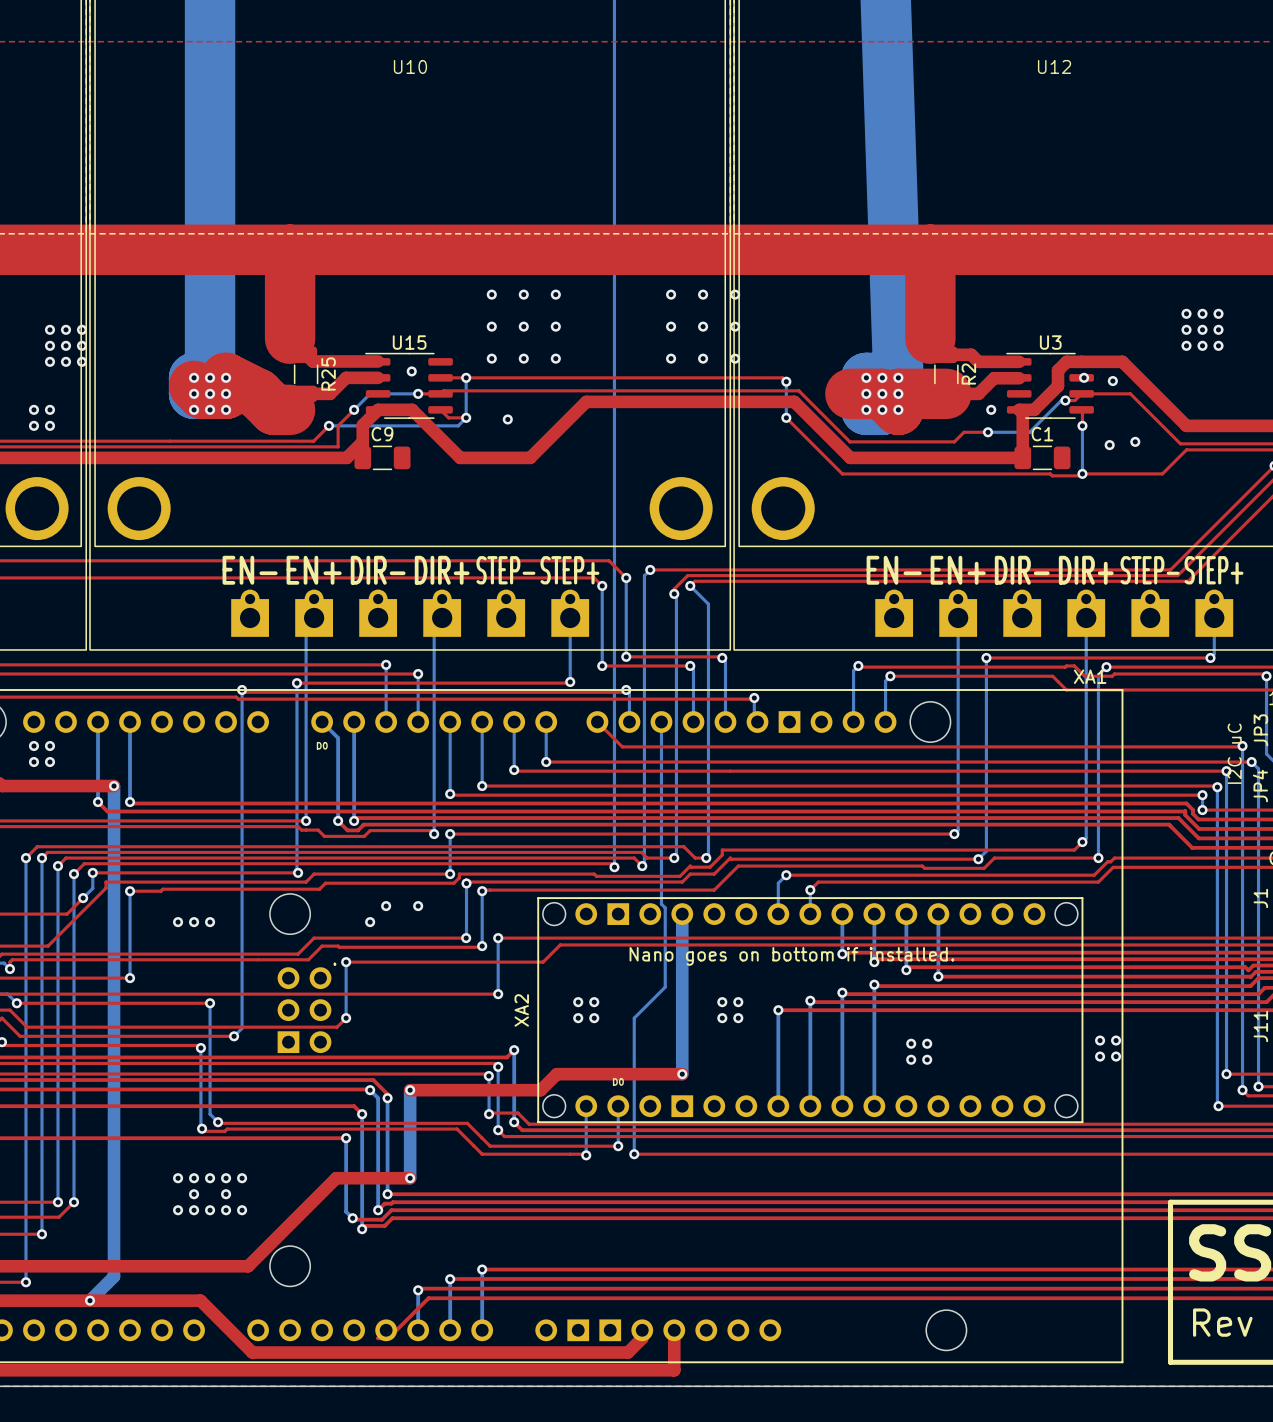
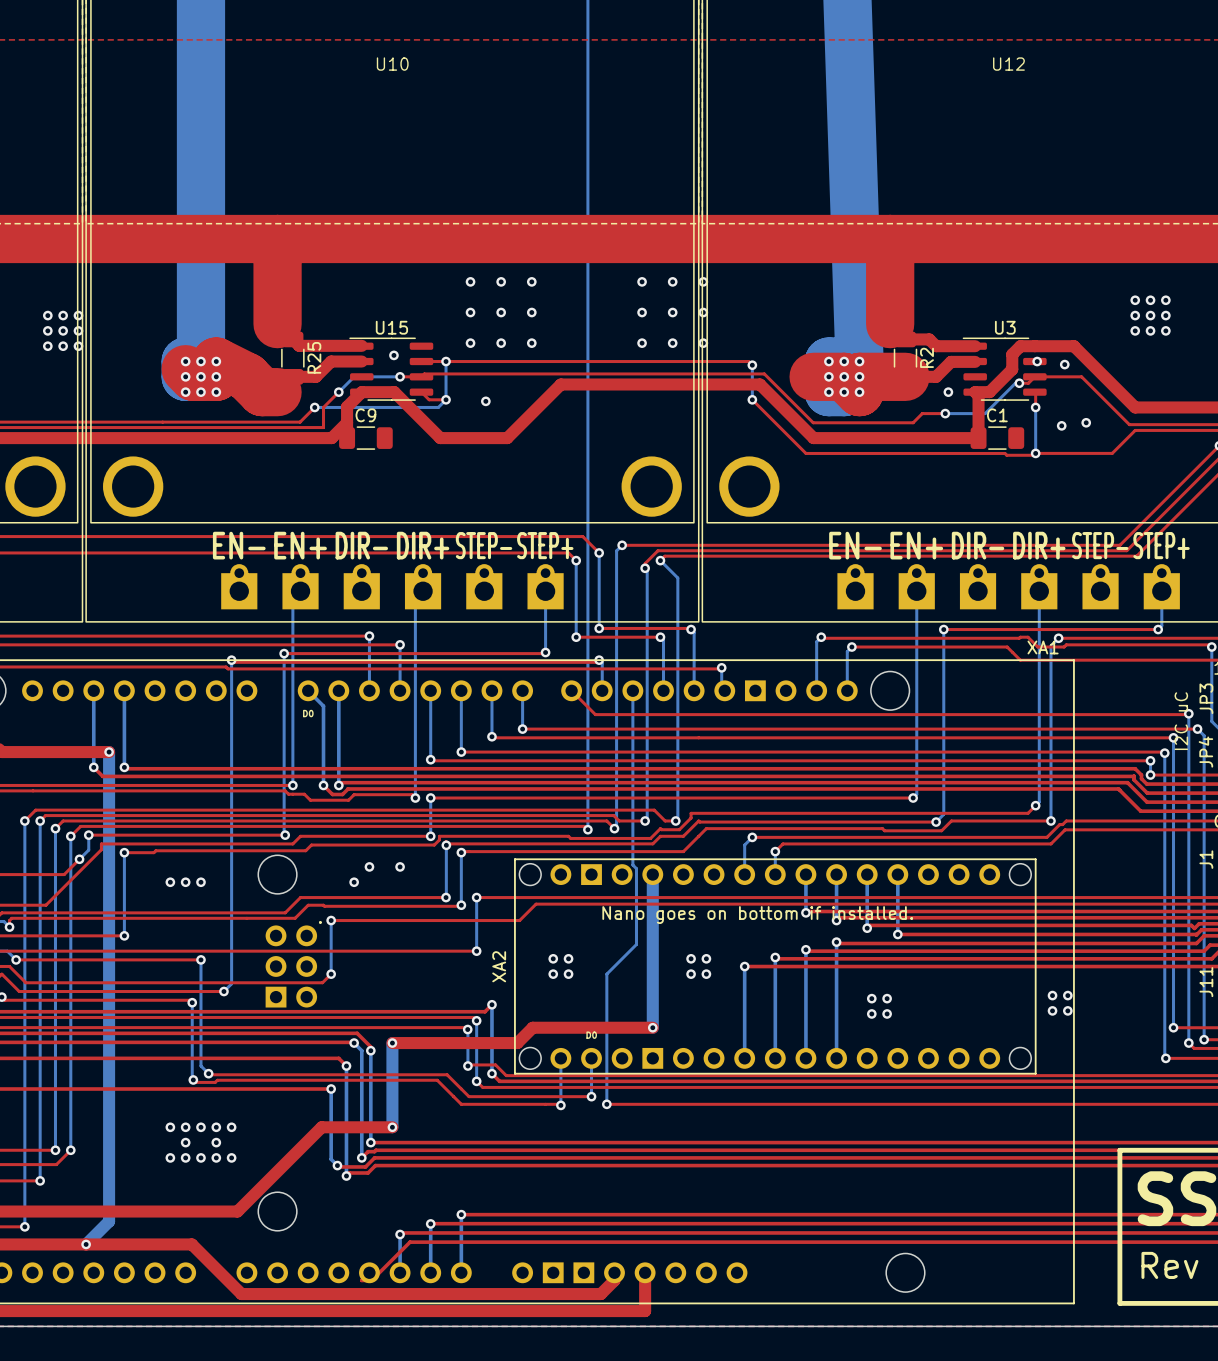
via: (33, 409) -> none
via: (49, 409) -> none
via: (33, 425) -> none
via: (49, 425) -> none
via: (33, 746) -> none
via: (49, 746) -> none
via: (33, 762) -> none
via: (49, 762) -> none

